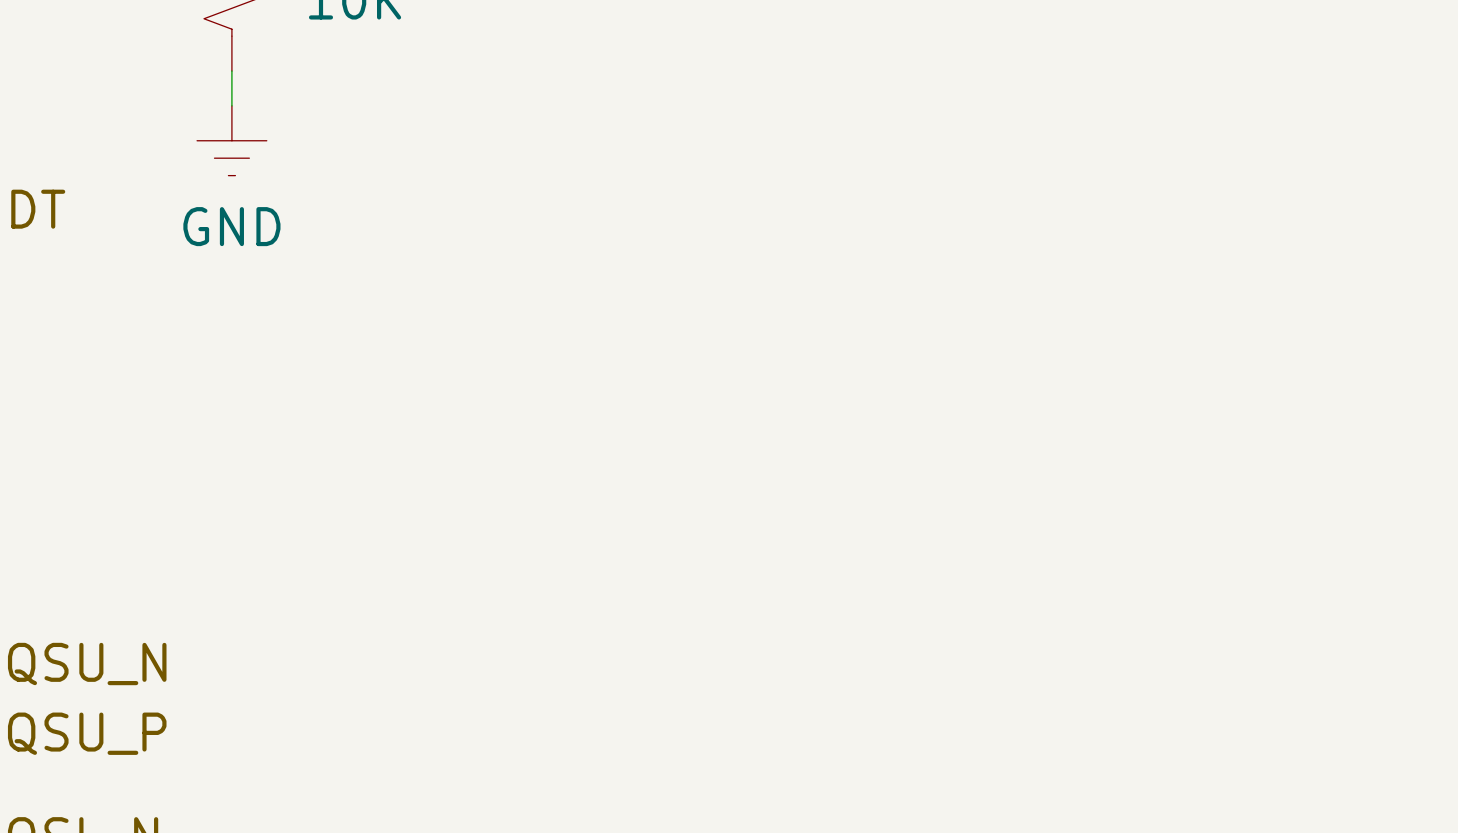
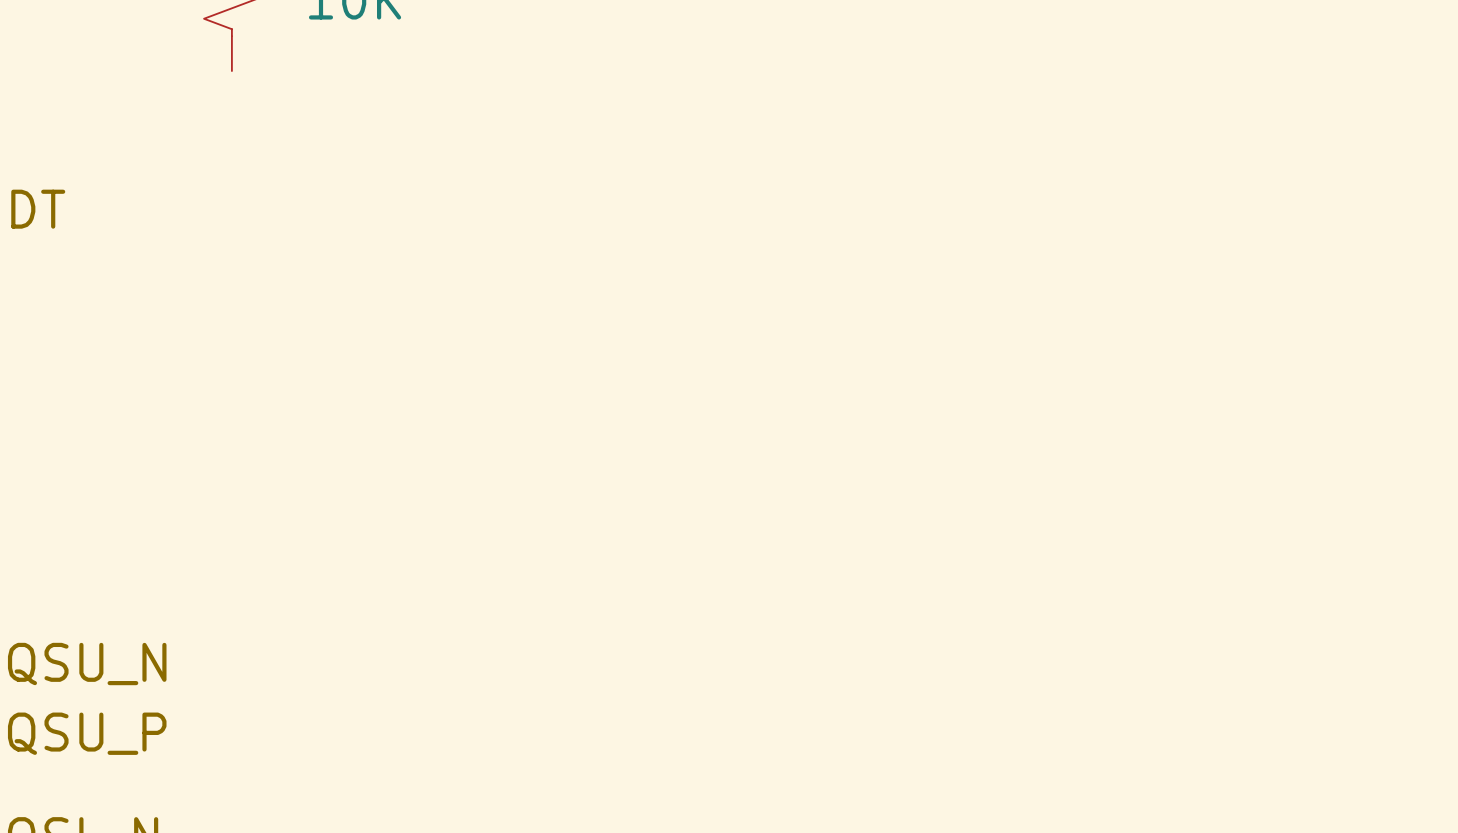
wire: (231, 71) (231, 105) -> none
power symbol: GND (231, 140) -> none

